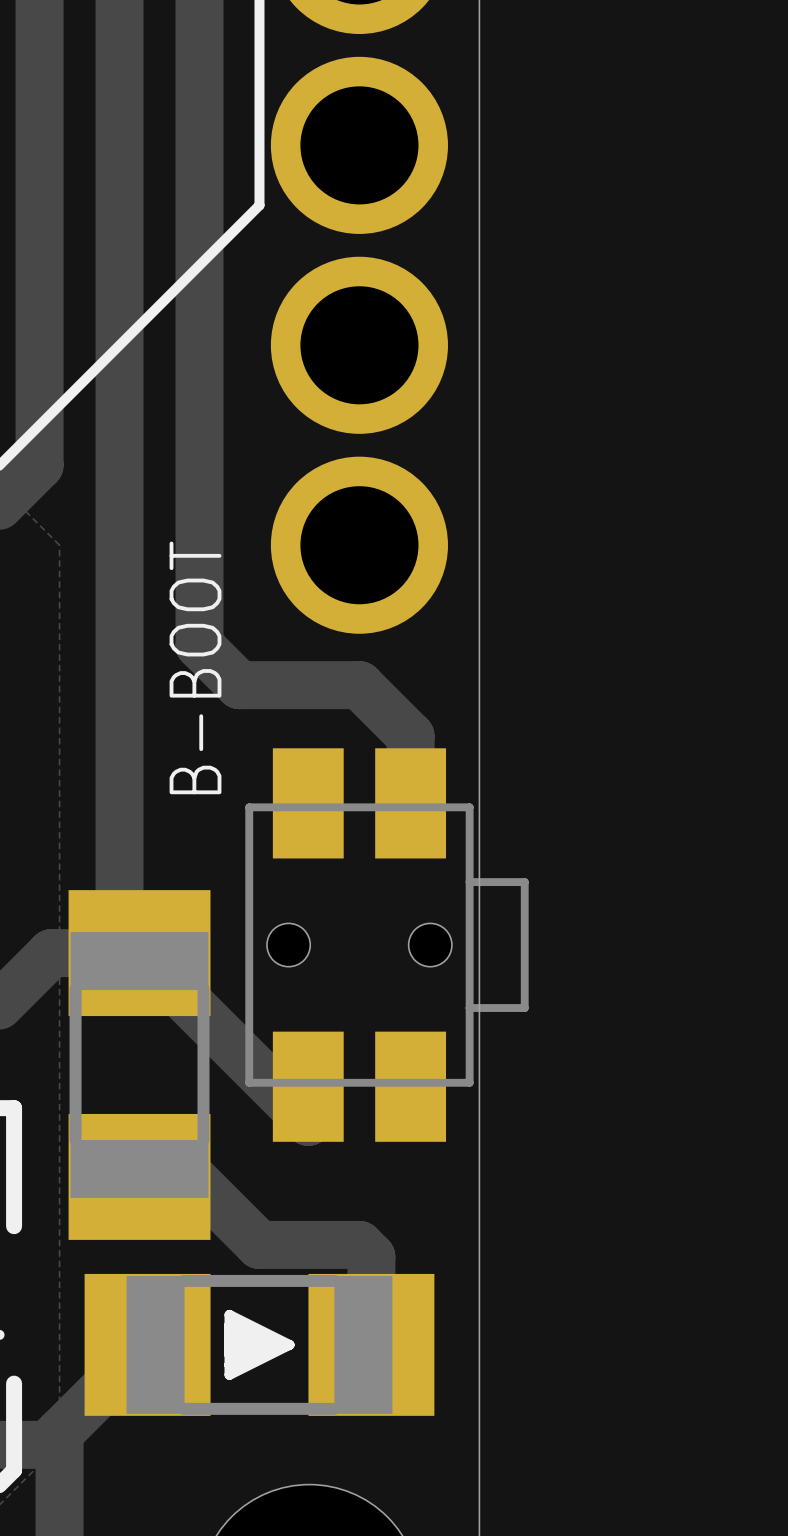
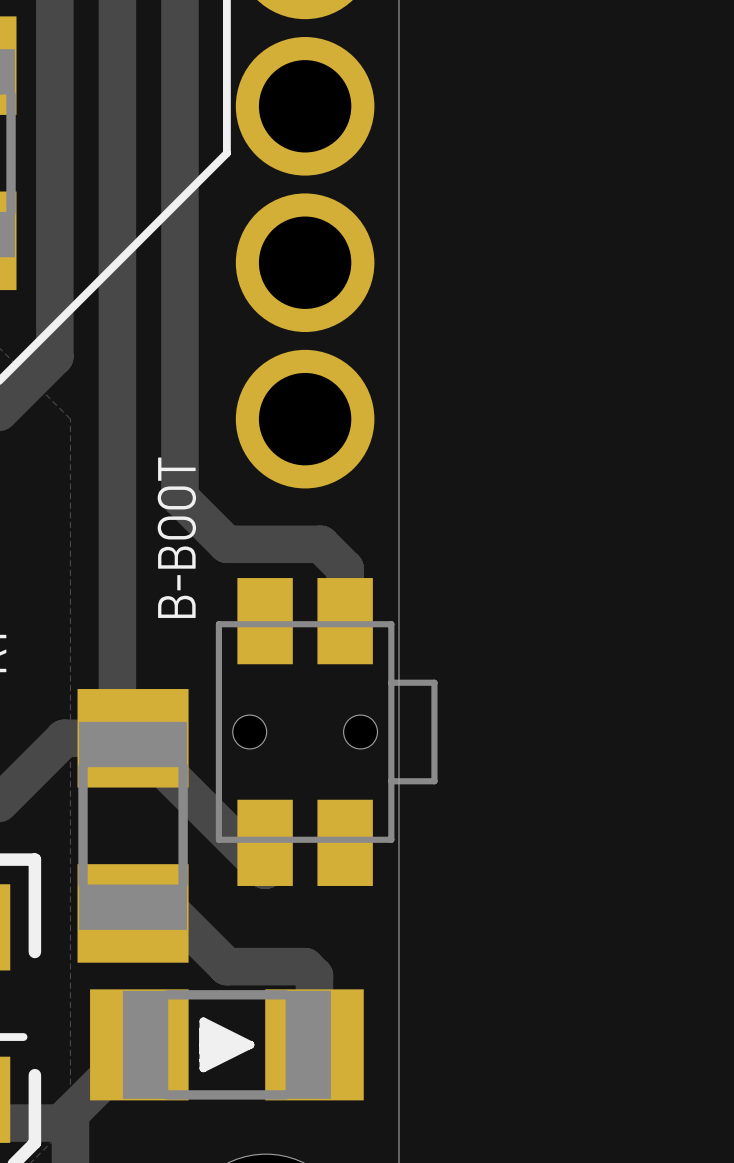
track: (239, 685) (359, 685) (379, 705) -> (211, 528) (226, 544) (320, 544)

